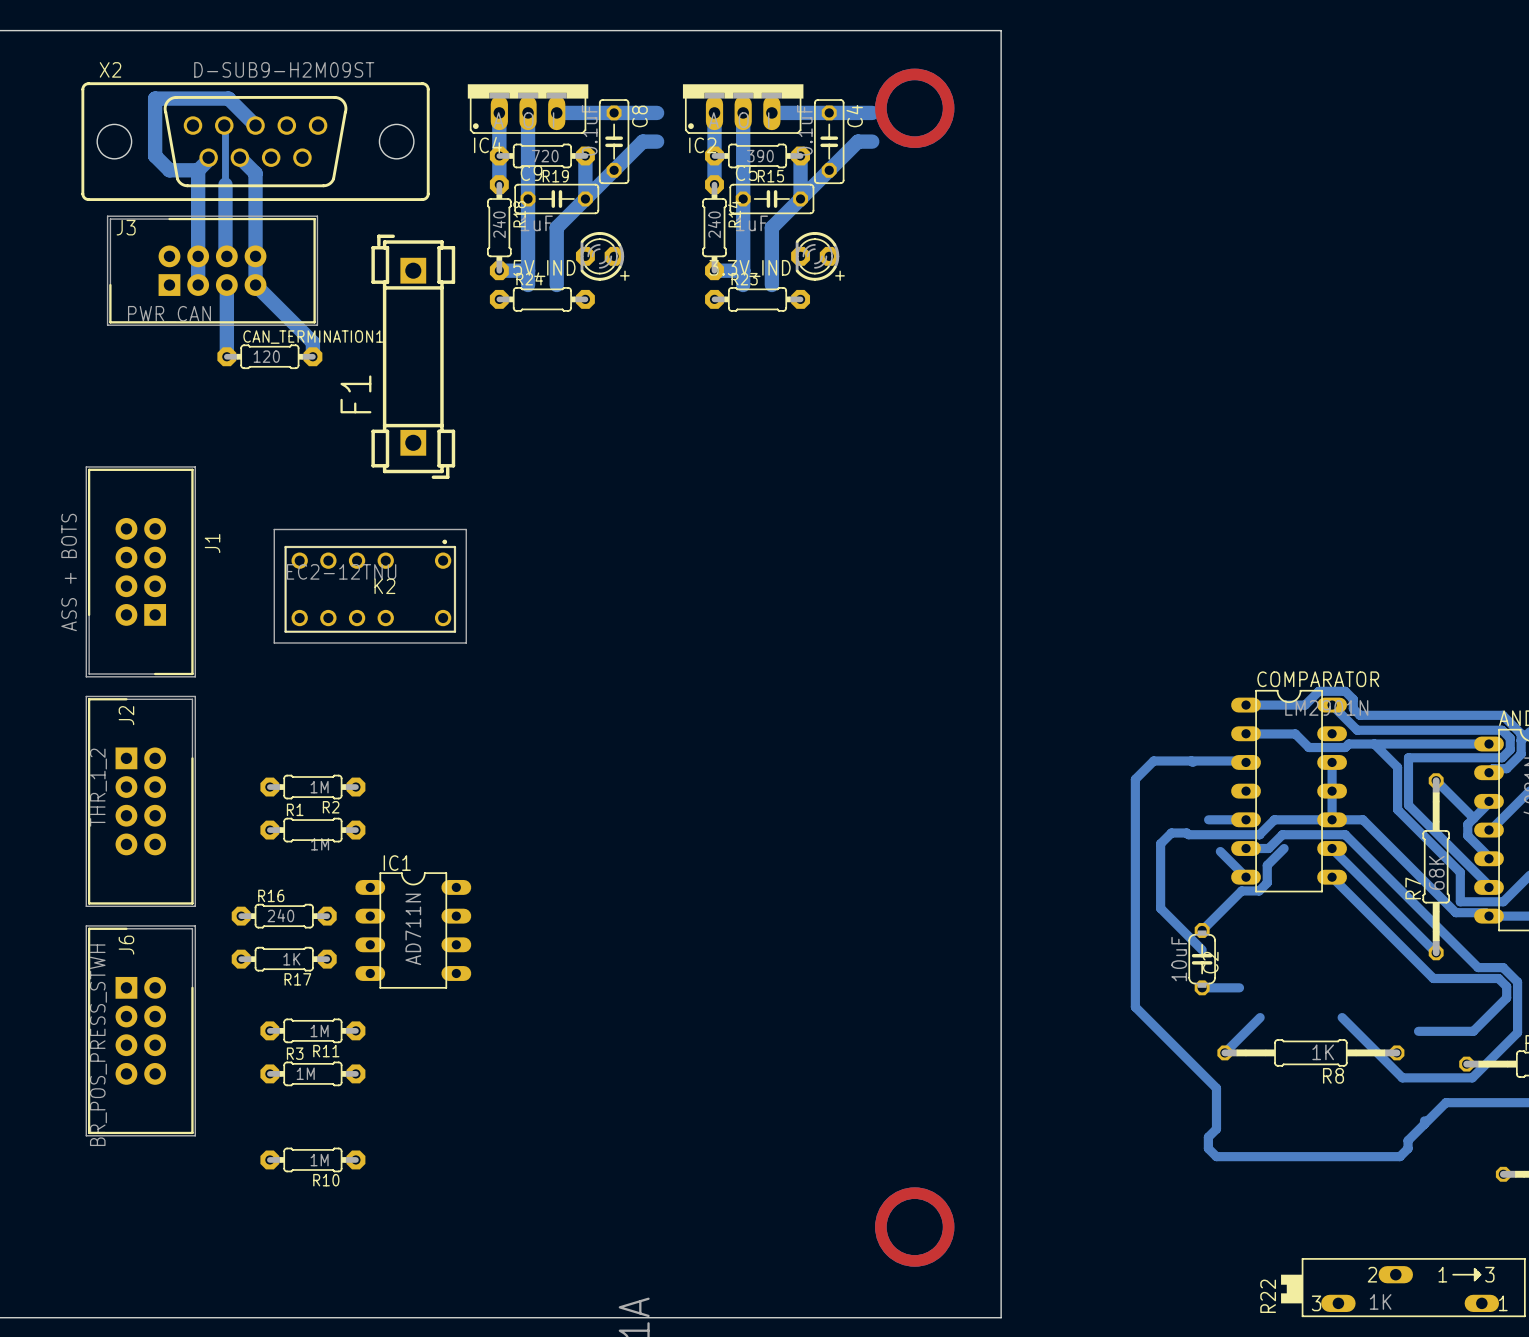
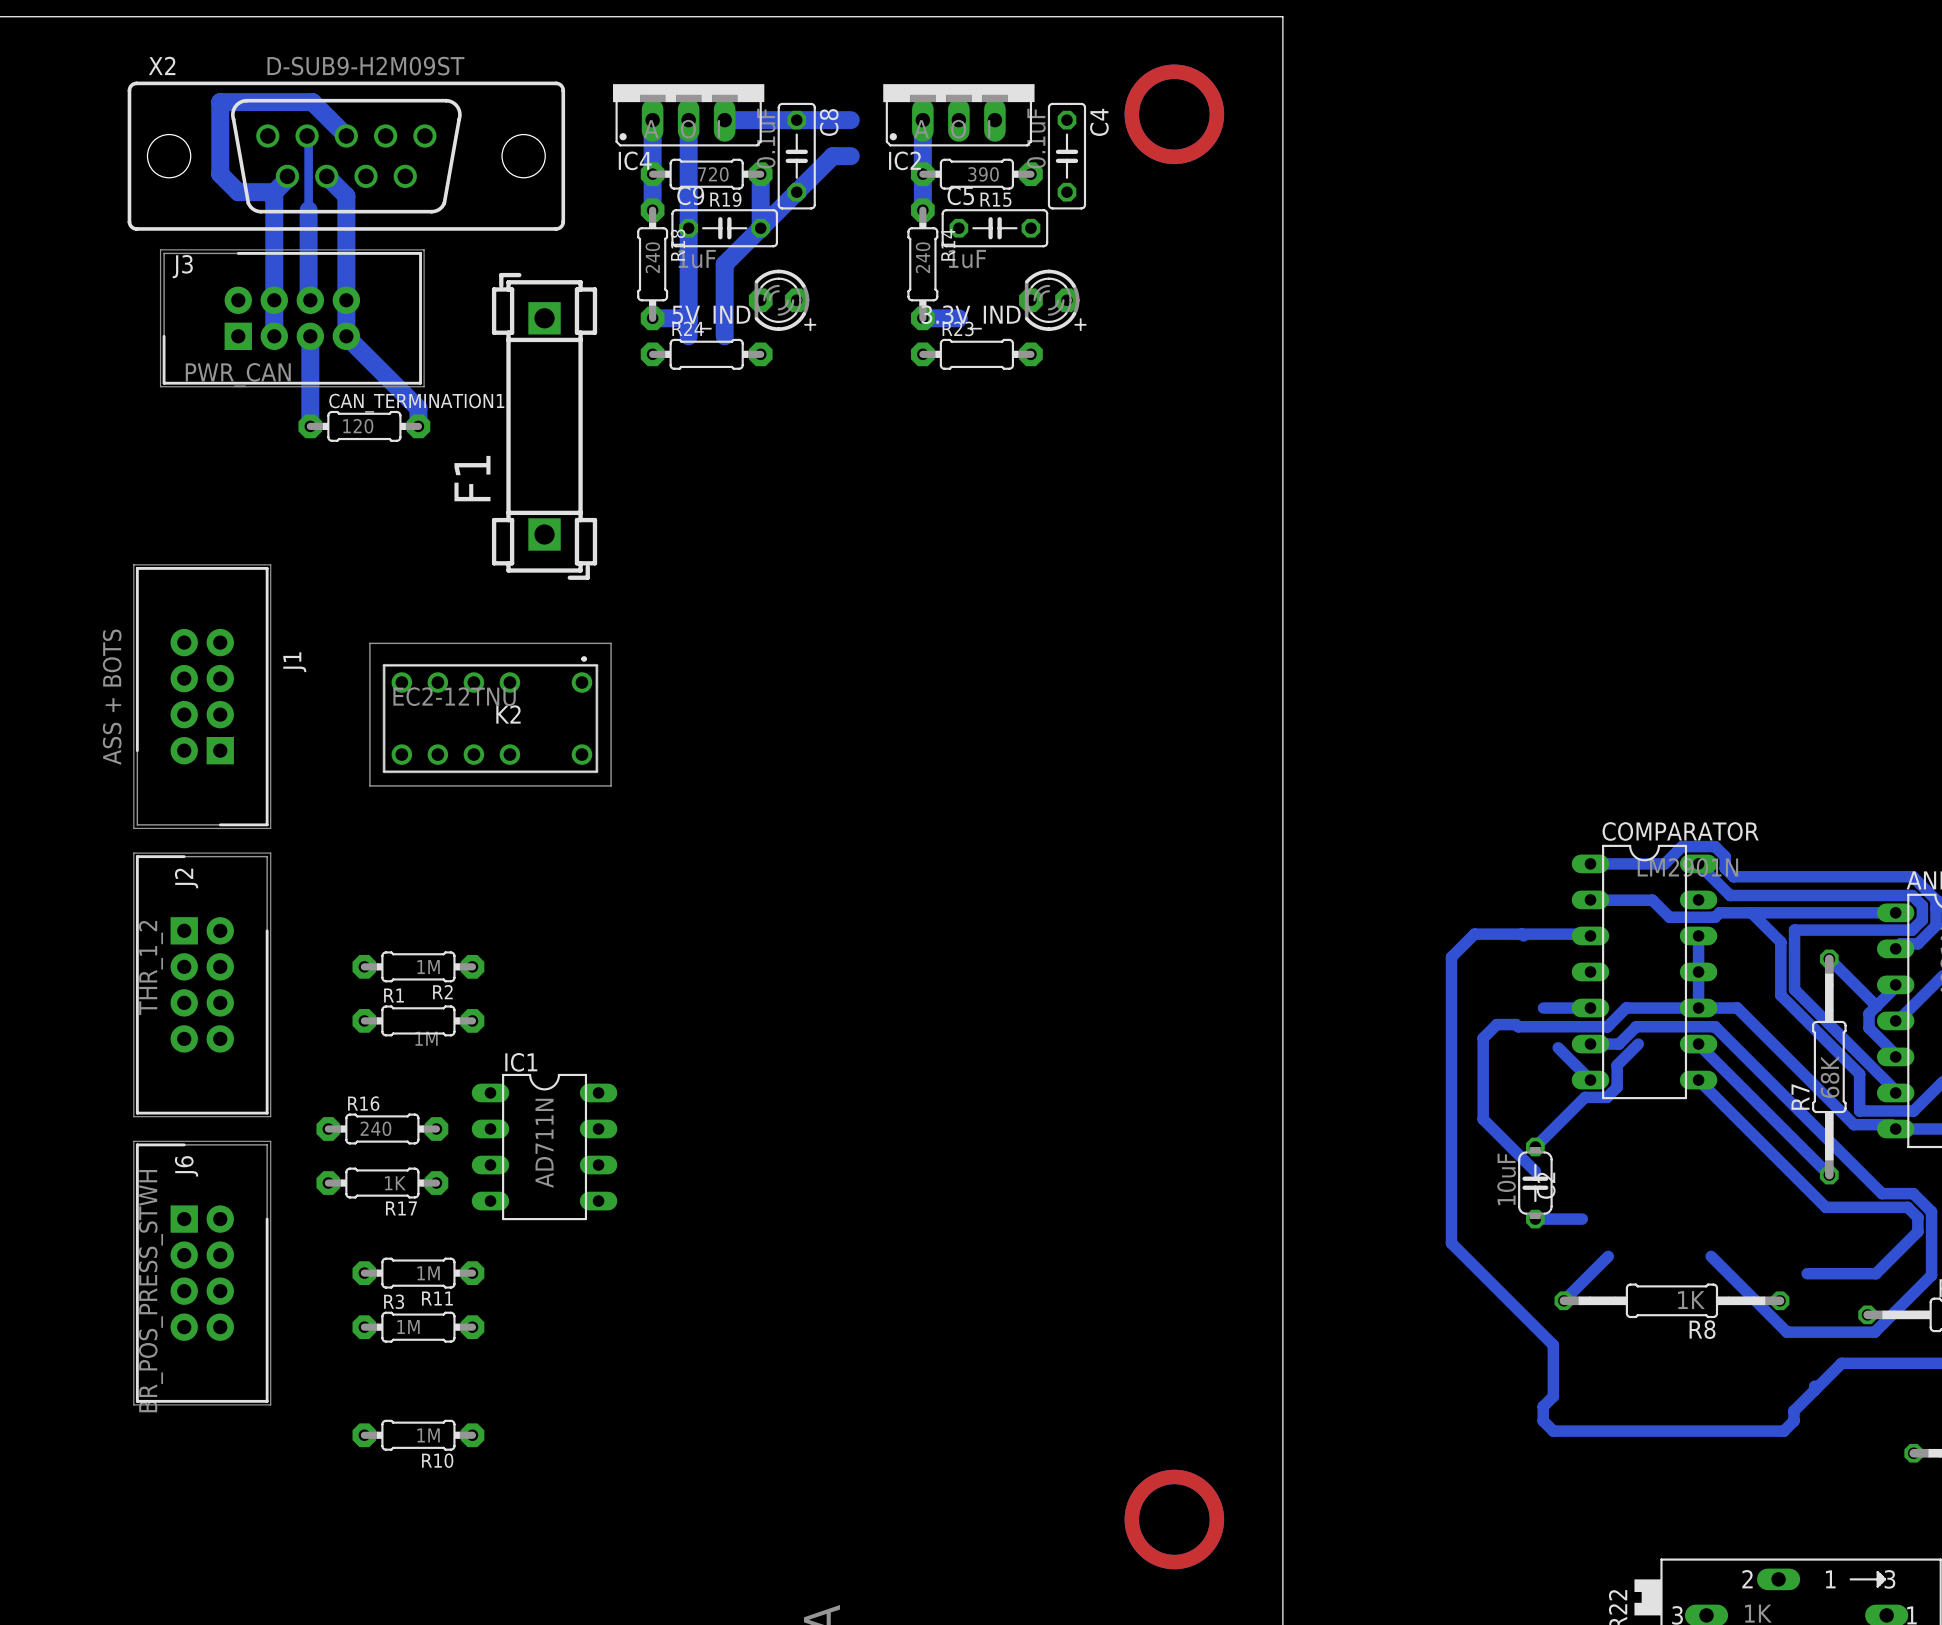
bottom track: (743, 112) (743, 285) -> none
bottom track: (771, 112) (872, 112) -> none
bottom track: (872, 141) (857, 141) (771, 227) (771, 285) -> none
bottom track: (800, 155) (800, 198) -> none

